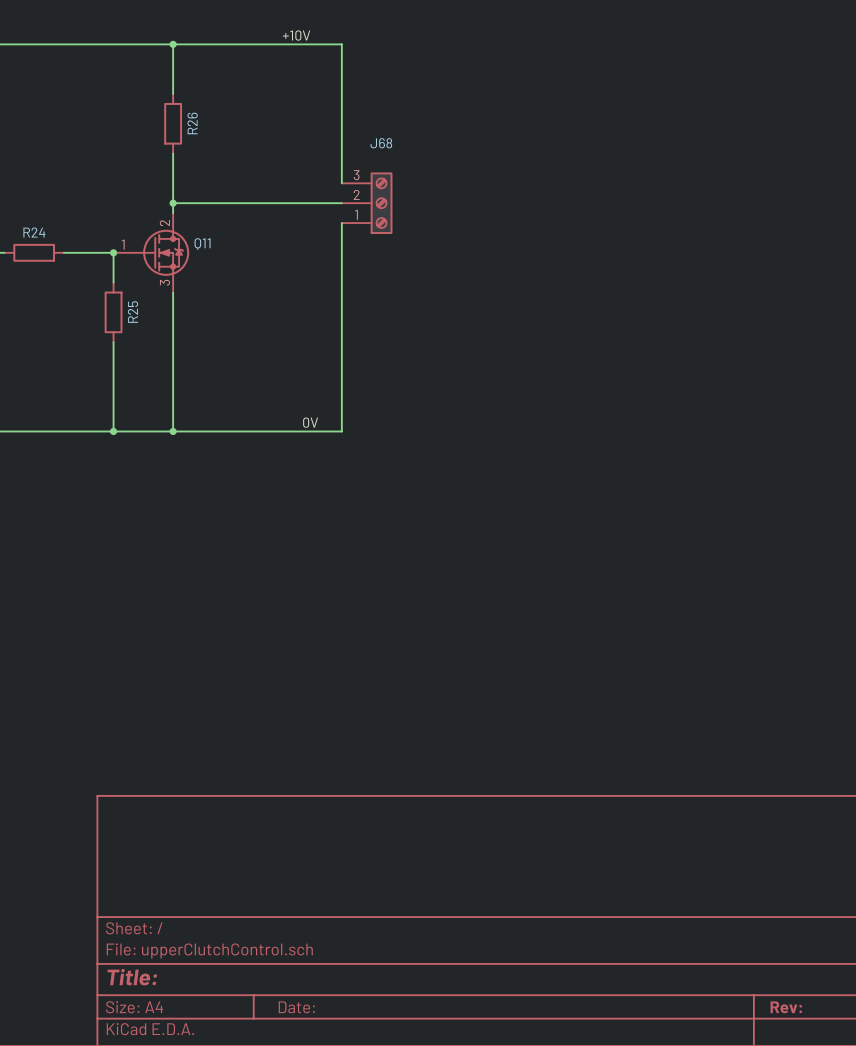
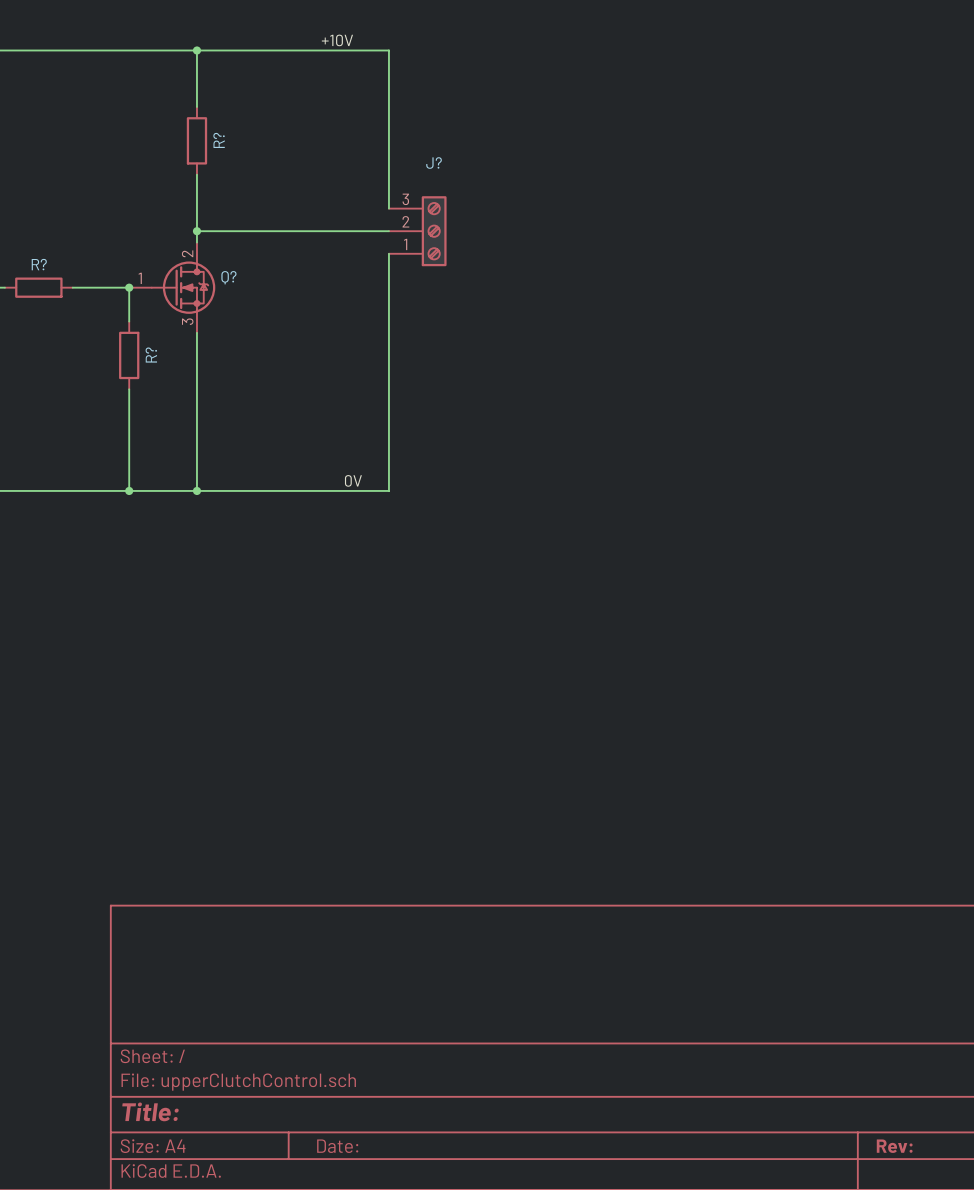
R26 name: R26 (192, 123) -> R? (219, 140)
J68 name: J68 (381, 143) -> J? (434, 163)
R24 name: R24 (34, 232) -> R? (39, 264)
Q11 name: Q11 (202, 244) -> Q? (228, 277)
R25 name: R25 (133, 312) -> R? (151, 355)

